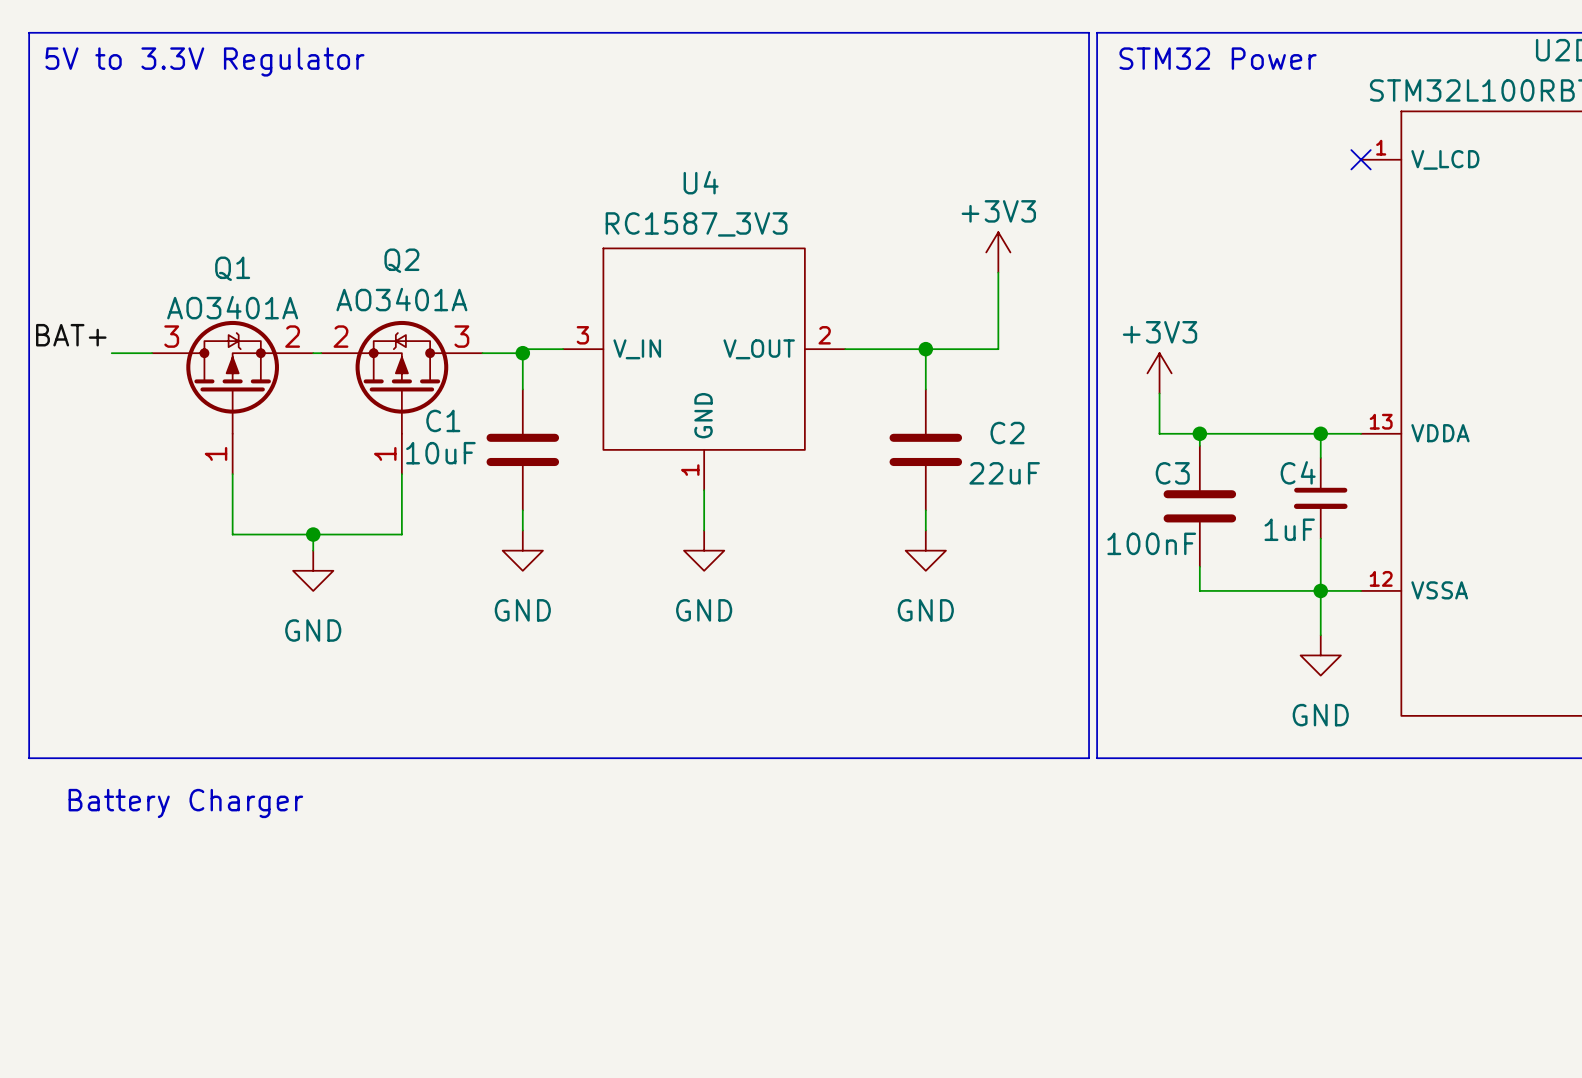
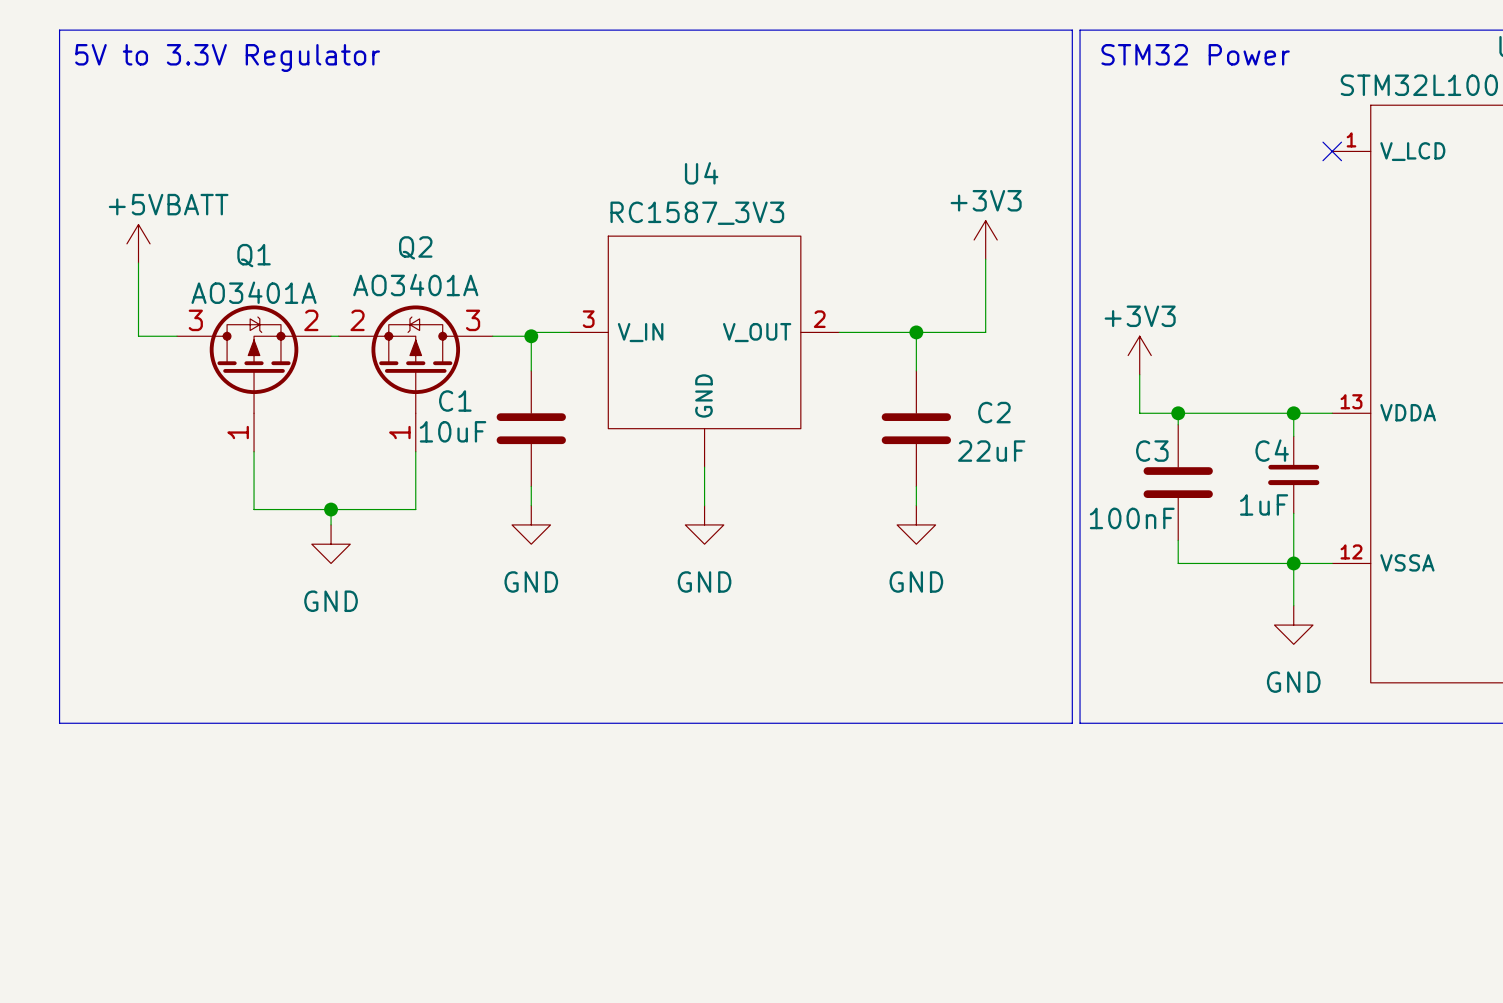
power symbol: none -> +5VBATT (138, 243)
wire: none -> (138, 263) (138, 336)
label: BAT+ (71, 335) -> none
U4 pin number: 1 (690, 470) -> none
text: Battery Charger (185, 803) -> none

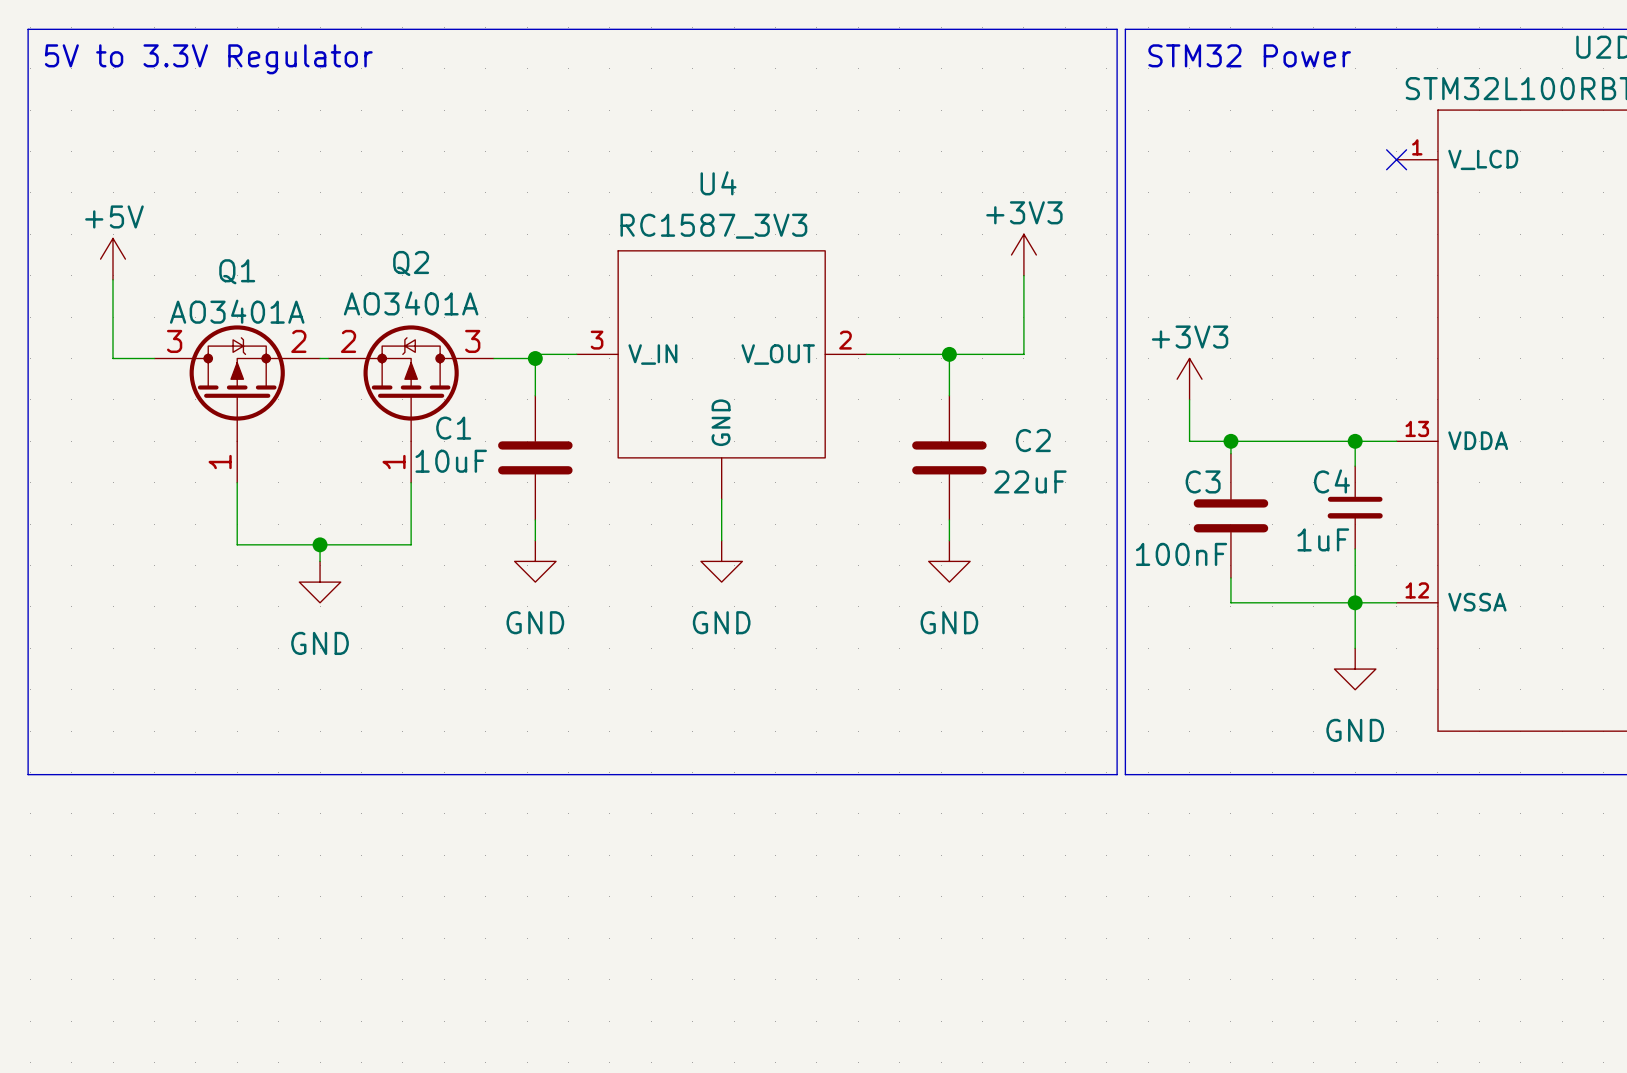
power symbol: +5VBATT (138, 243) -> +5V (113, 259)

